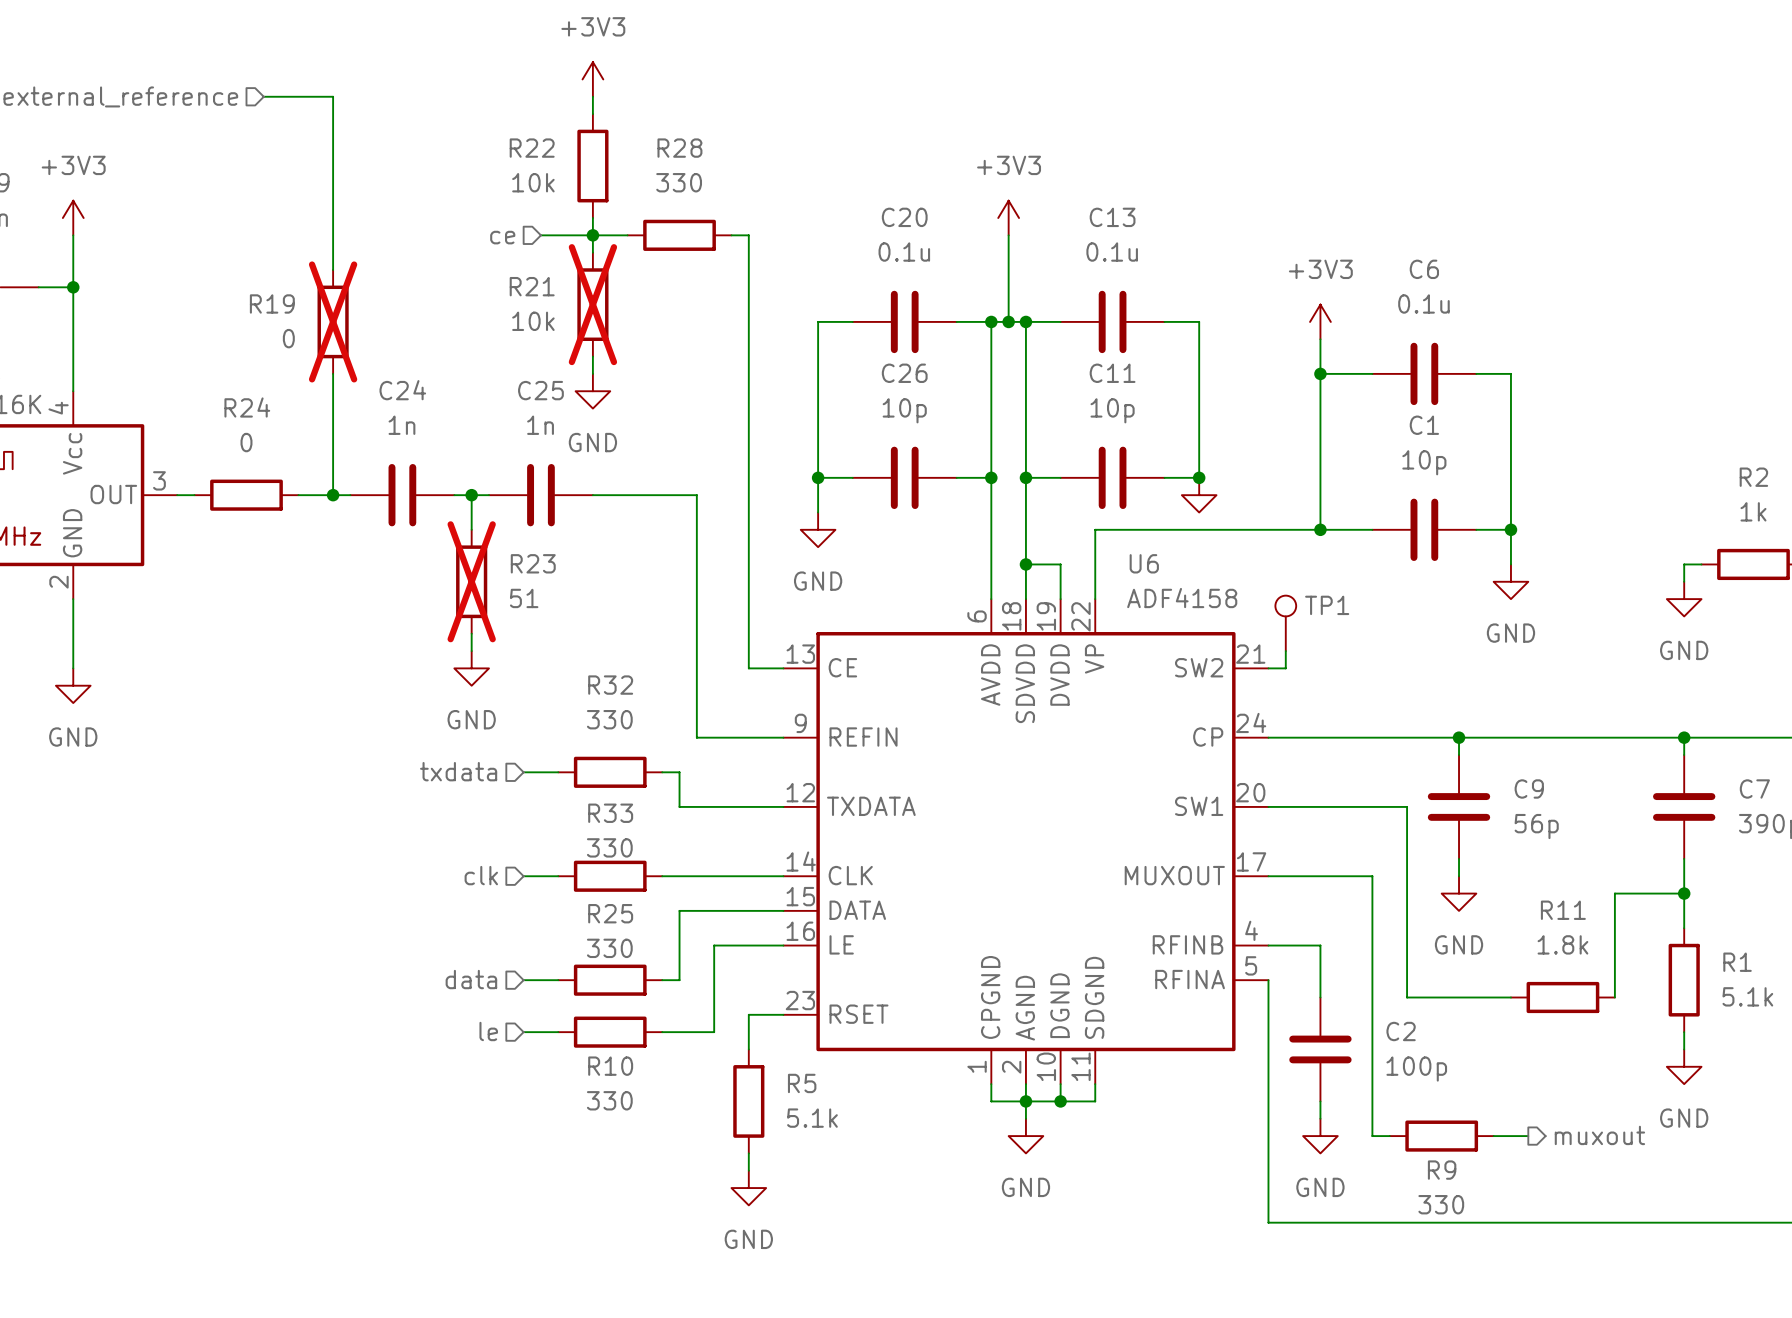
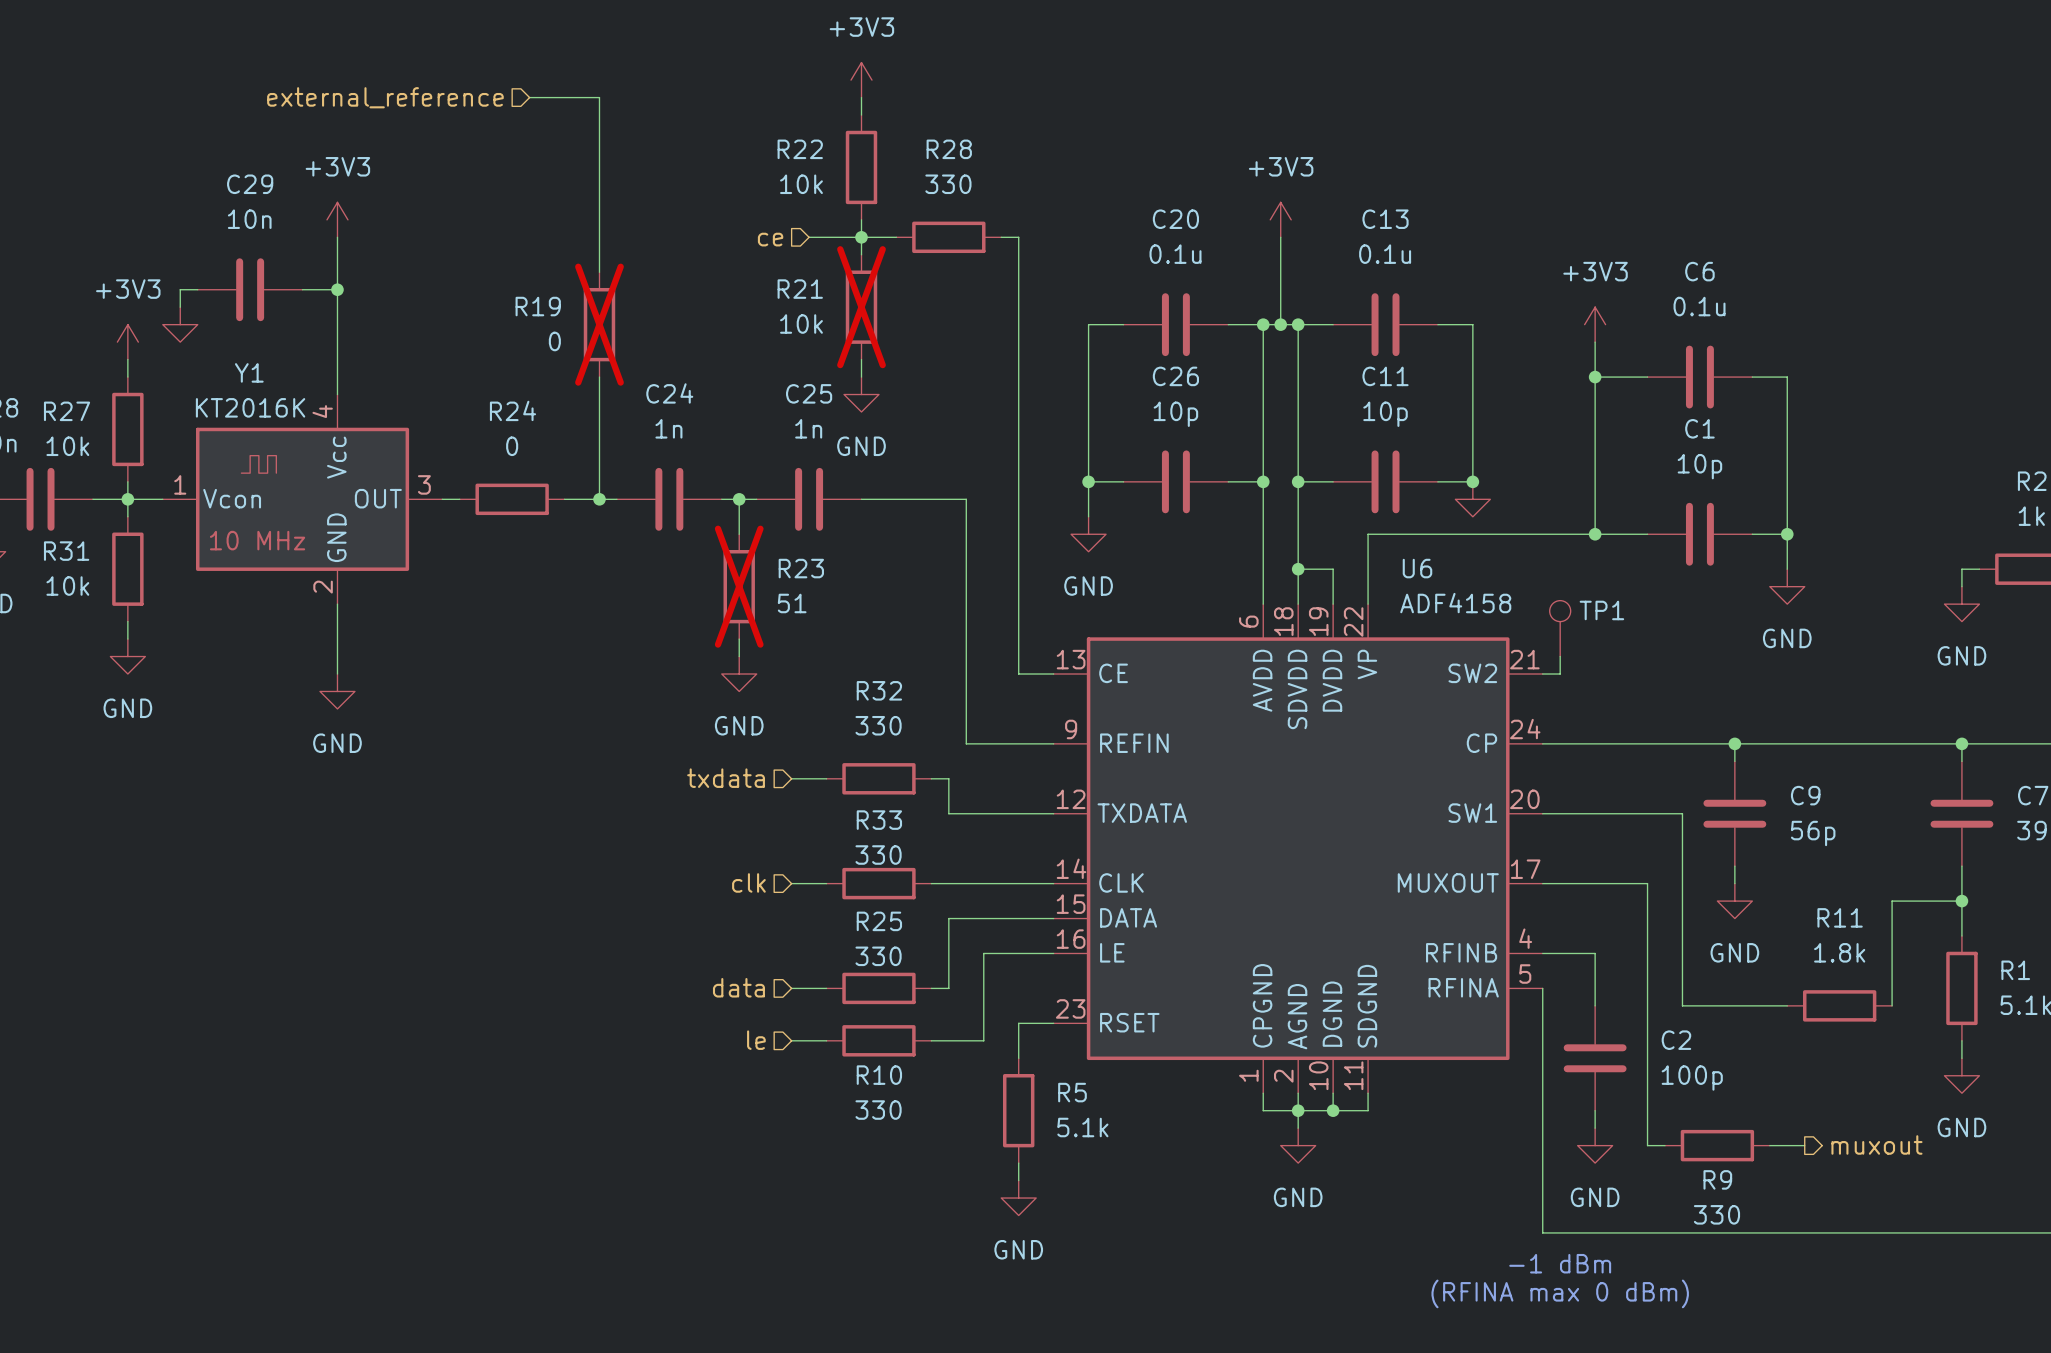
text: none -> -1 dBm (1560, 1263)
text: none -> (RFINA max 0 dBm) (1560, 1293)

